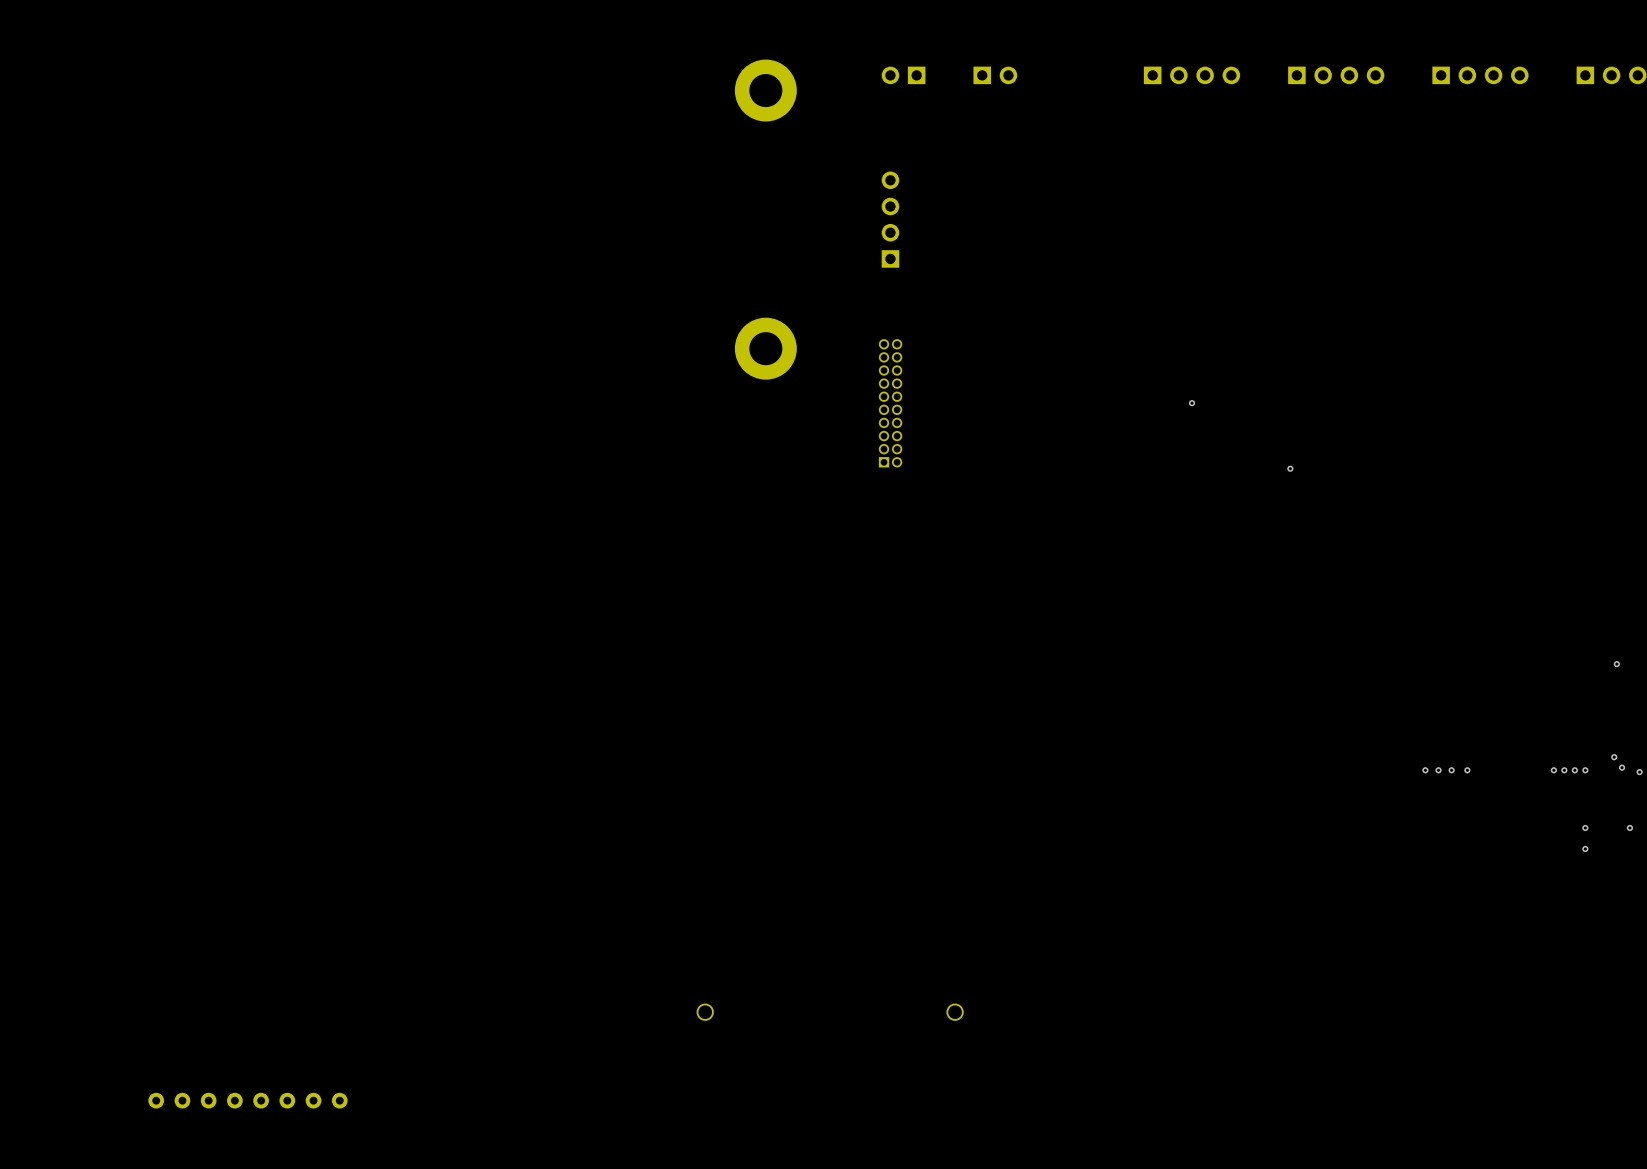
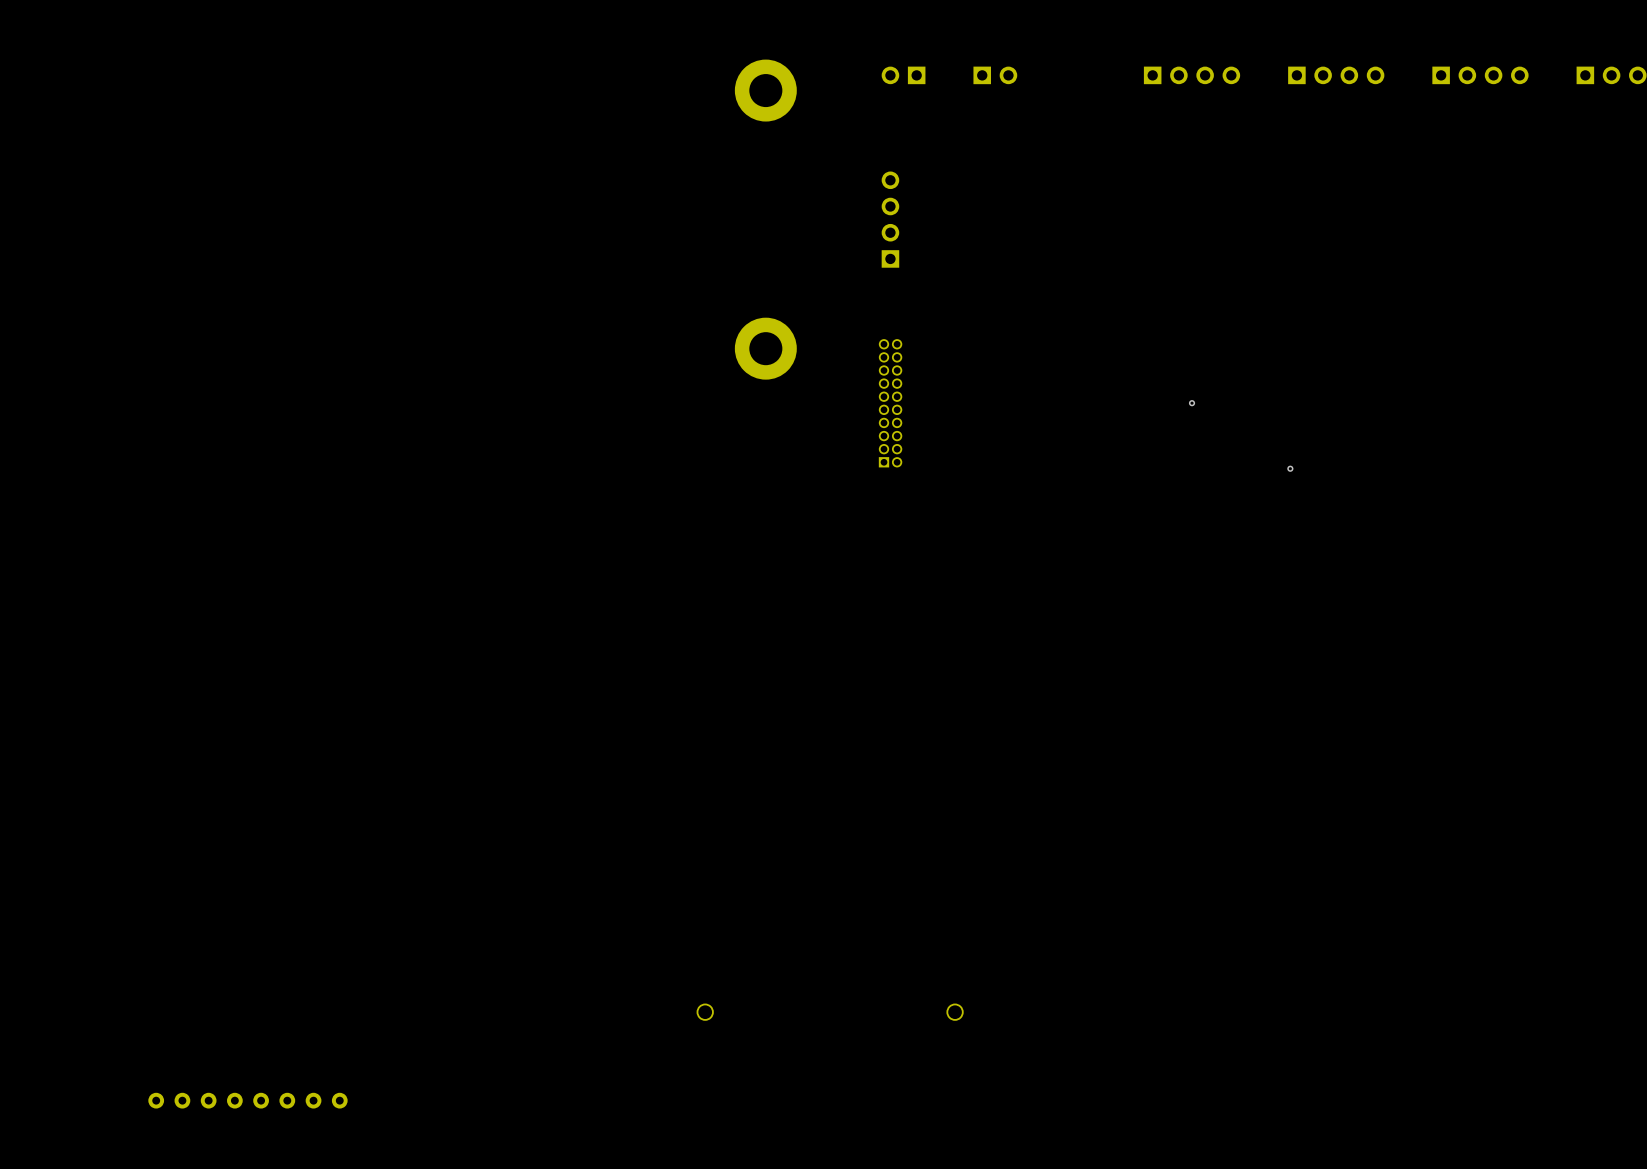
via: (1616, 664) -> none
via: (1614, 757) -> none
via: (1622, 767) -> none
via: (1425, 770) -> none
via: (1438, 770) -> none
via: (1451, 770) -> none
via: (1467, 770) -> none
via: (1553, 770) -> none
via: (1564, 770) -> none
via: (1574, 770) -> none
via: (1585, 770) -> none
via: (1639, 772) -> none
via: (1585, 827) -> none
via: (1629, 827) -> none
via: (1585, 848) -> none

